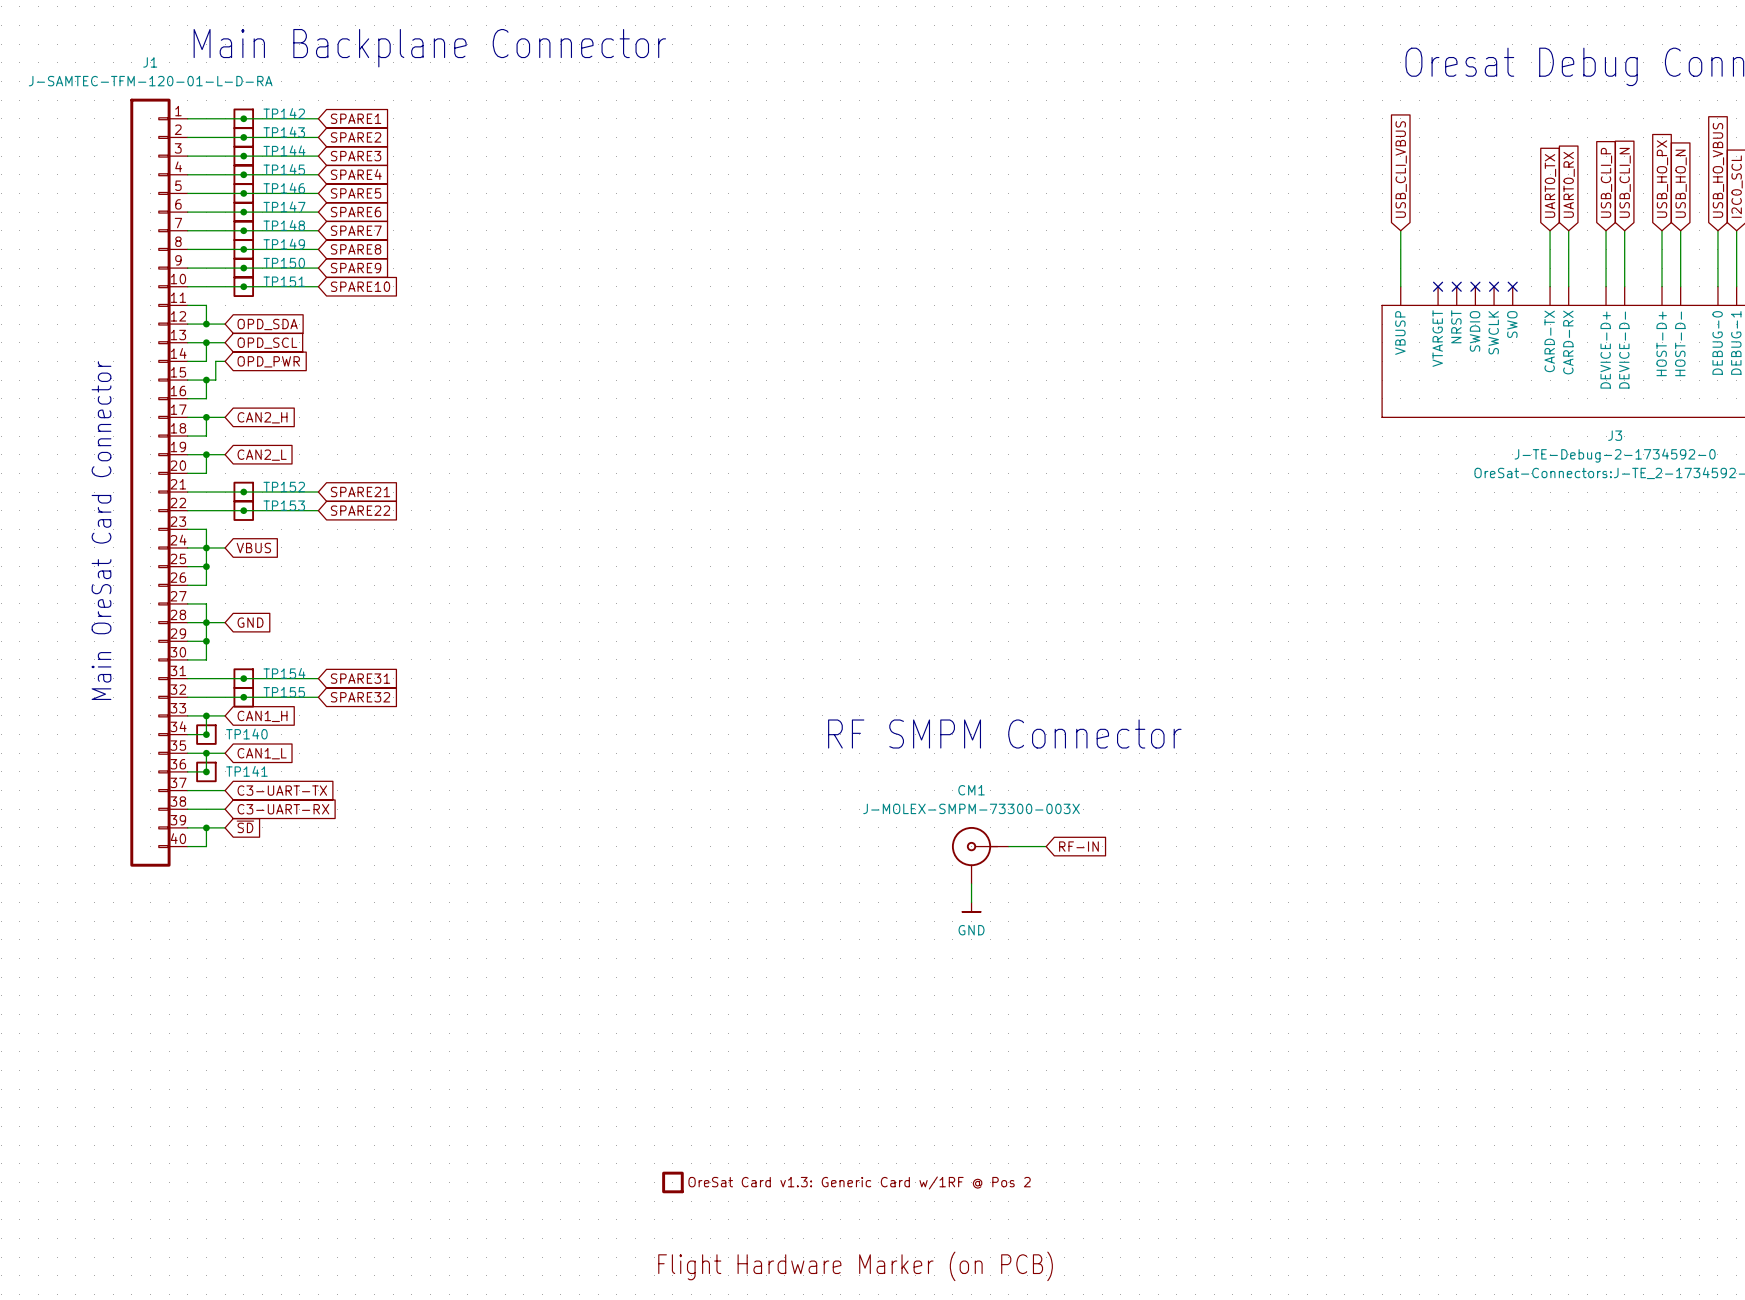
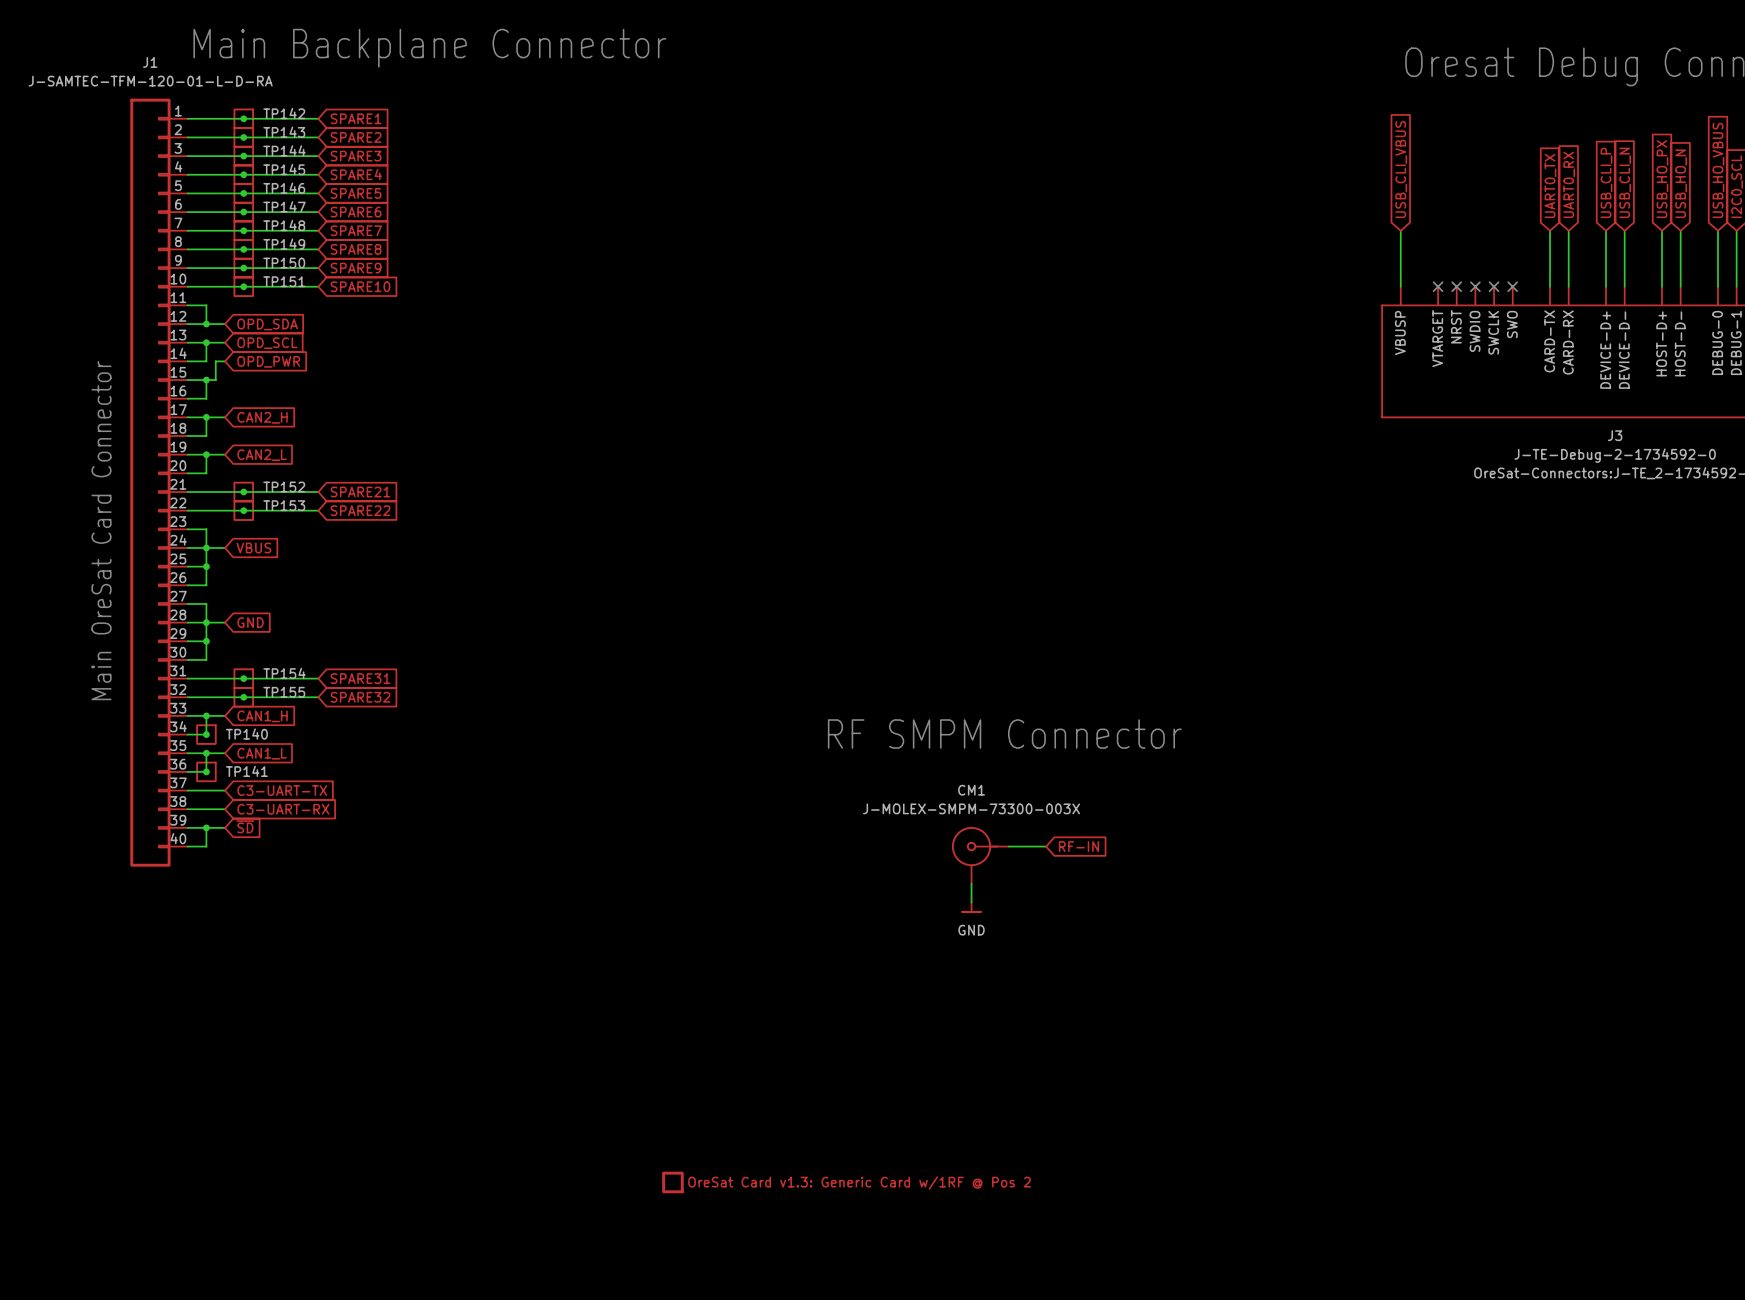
part: (855, 1266) -> none

